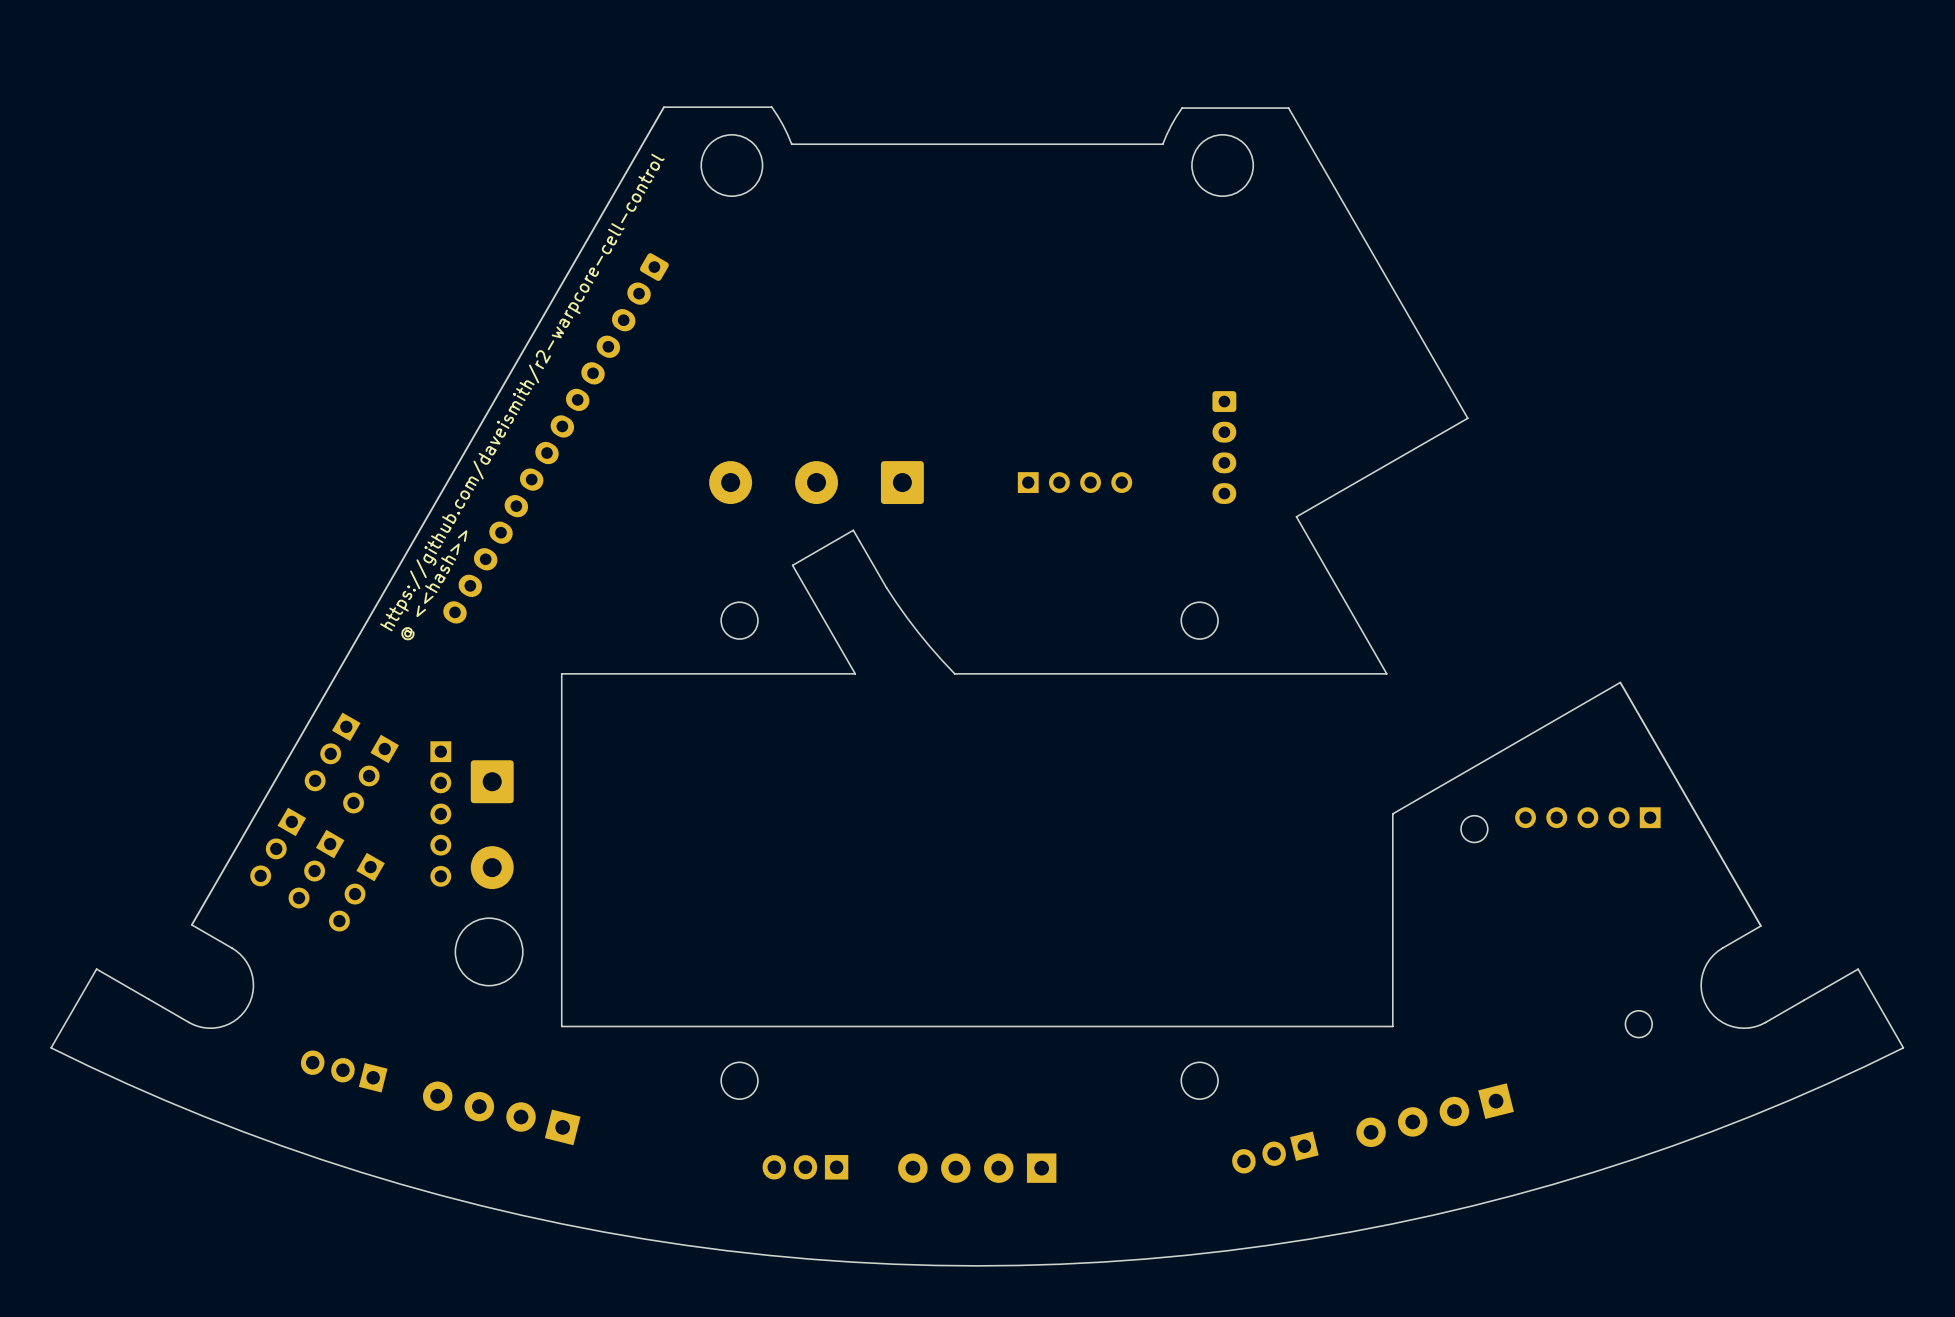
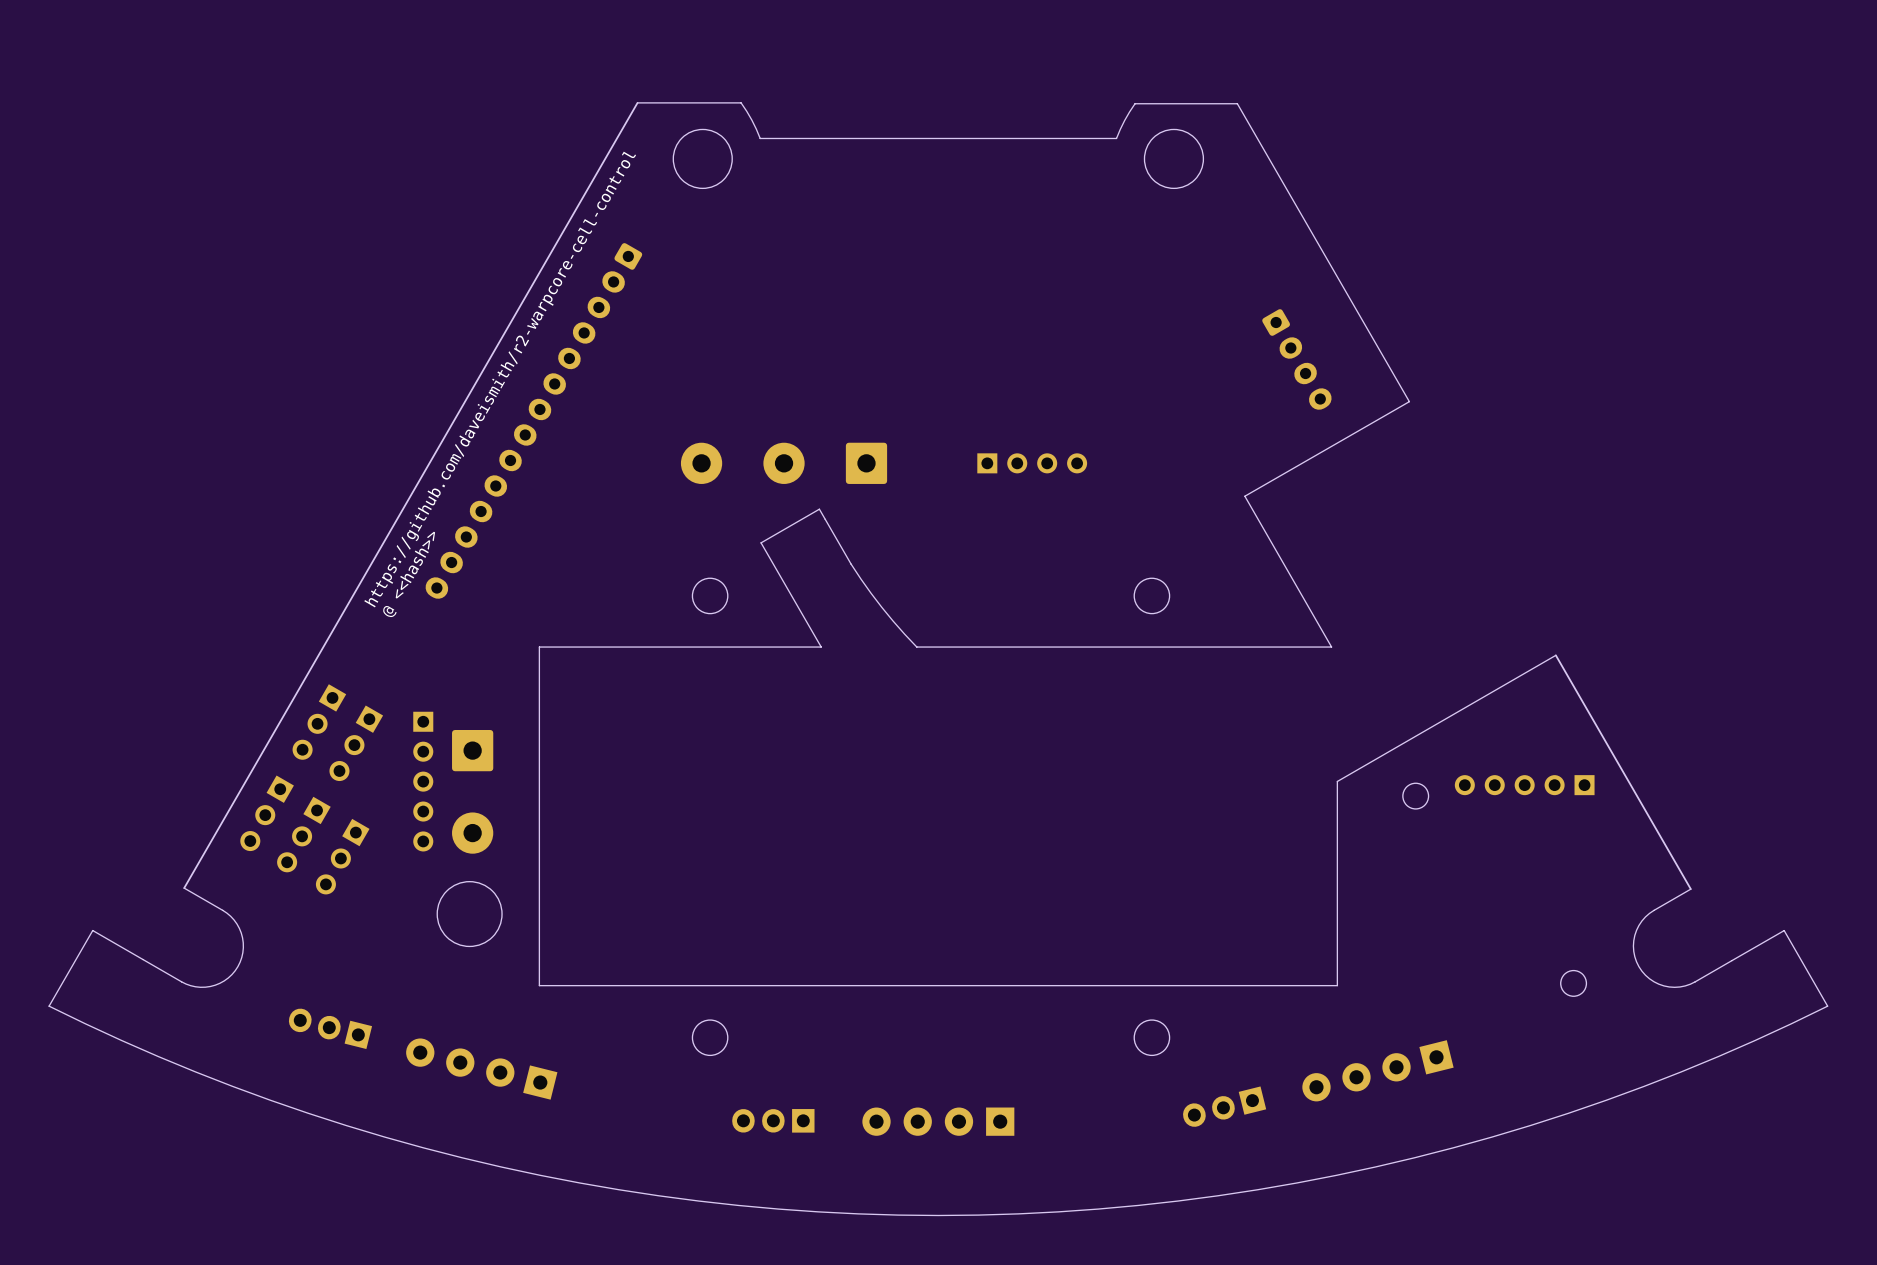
part: none -> (1296, 359)
part: (1224, 447) -> none

